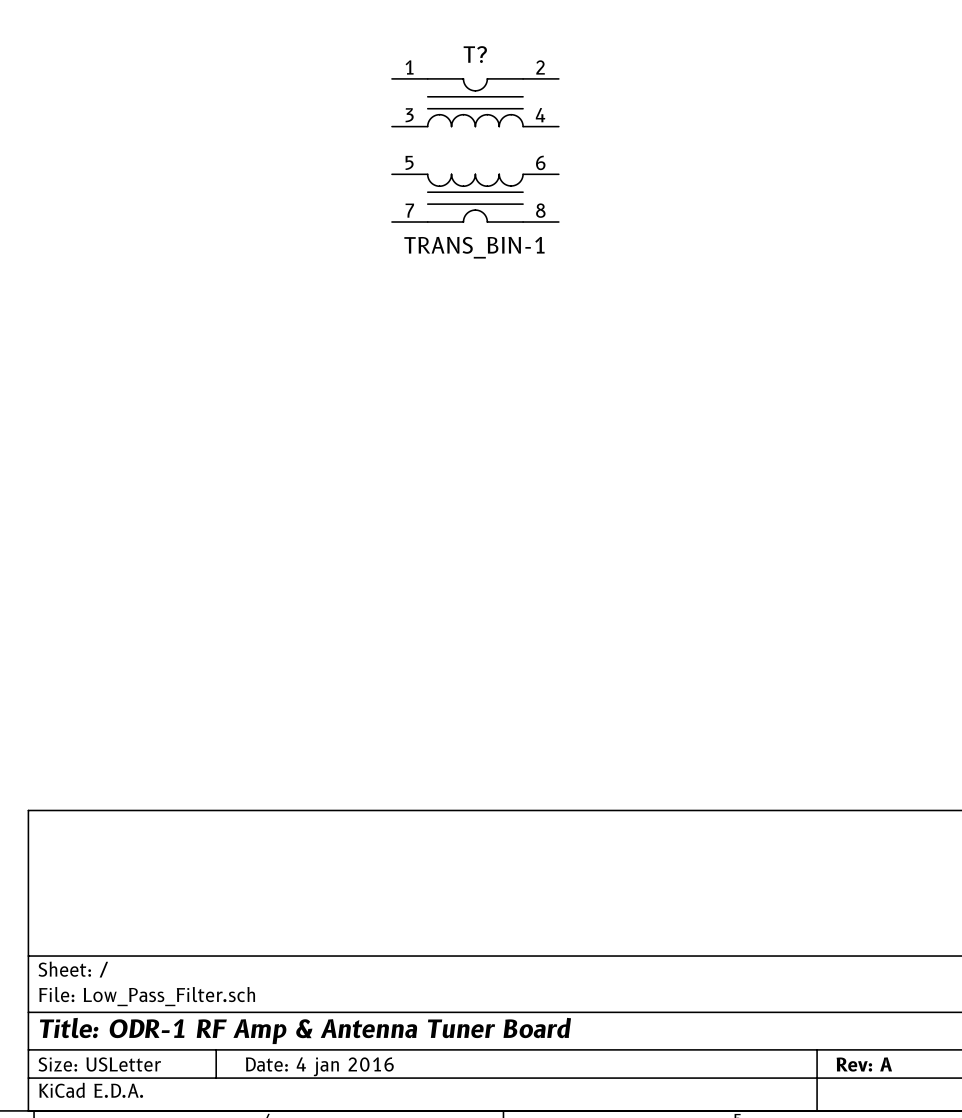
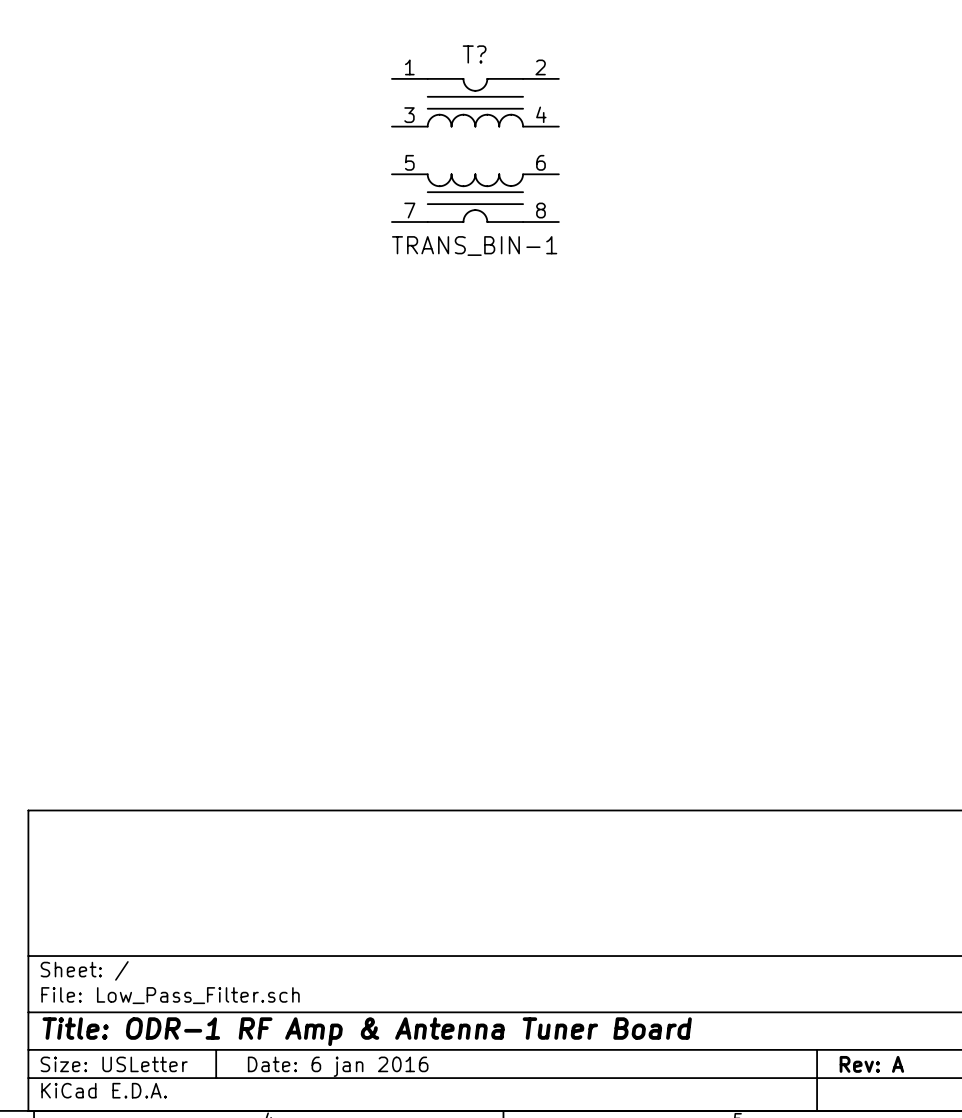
title block: Date: 4 jan 2016 (319, 1066) -> Date: 6 jan 2016 (338, 1066)

